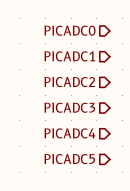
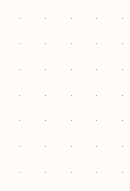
hierarchical label: PICADC0 (69, 30) -> none
hierarchical label: PICADC1 (69, 56) -> none
hierarchical label: PICADC2 (69, 82) -> none
hierarchical label: PICADC3 (69, 107) -> none
hierarchical label: PICADC4 (69, 133) -> none
hierarchical label: PICADC5 (69, 159) -> none

